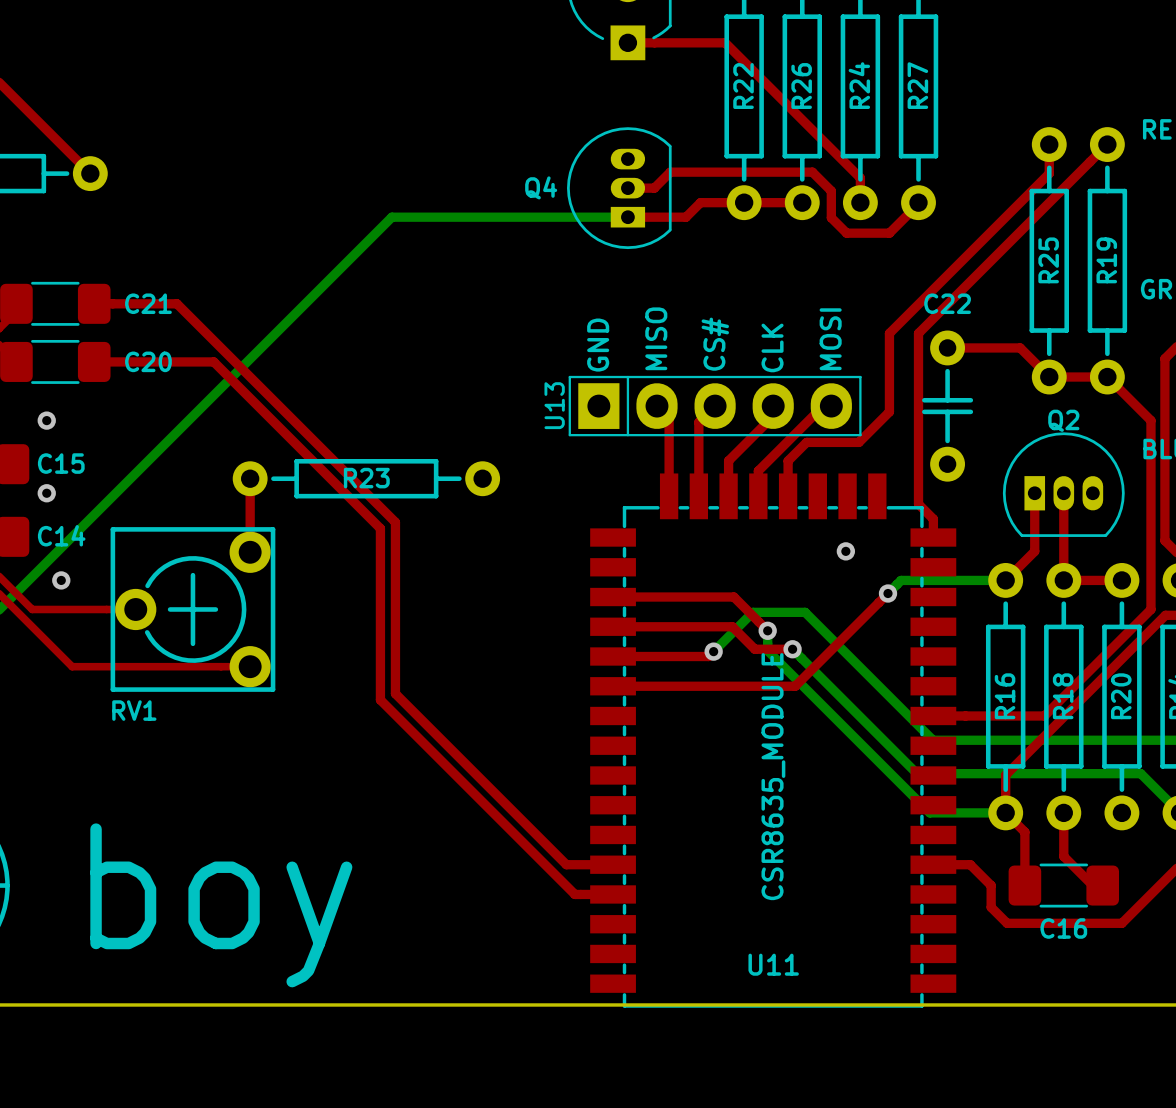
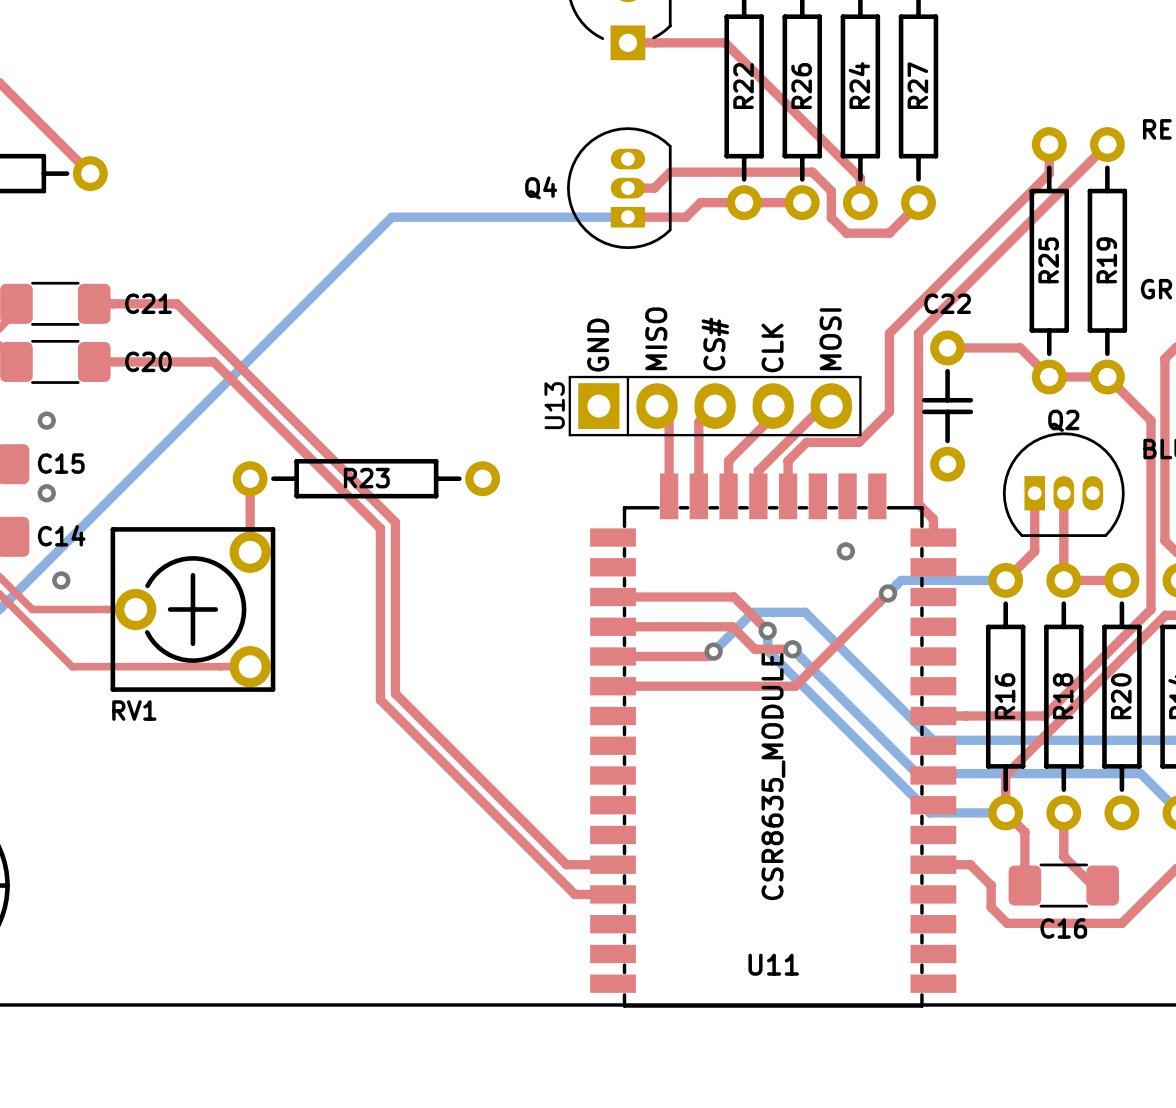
text: boy (221, 905) -> none

